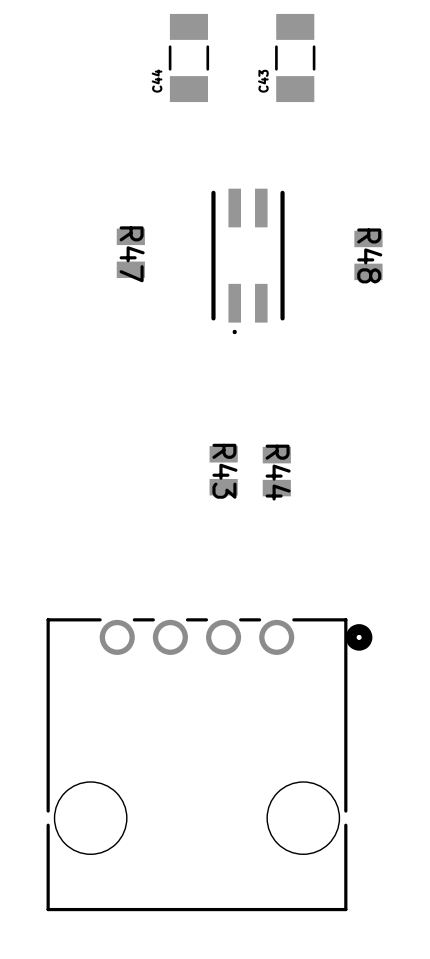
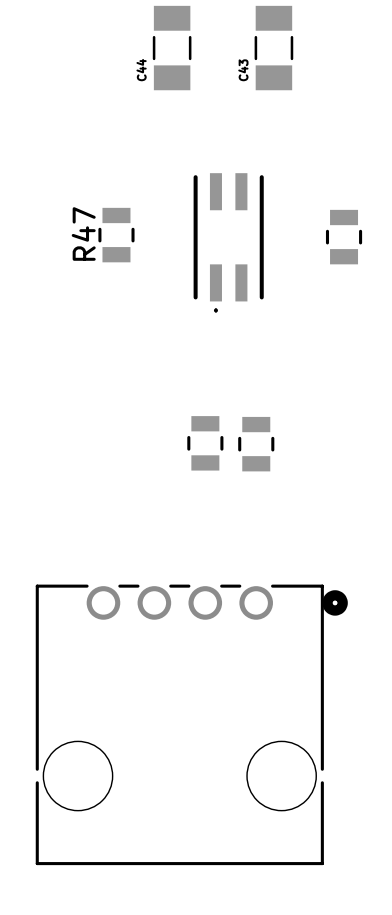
R47 footprint: [116, 228, 145, 279] -> [98, 207, 135, 263]
R48: (368, 255) -> none
part: none -> (344, 237)
R43: (223, 470) -> none
part: none -> (205, 443)
R44: (276, 471) -> none
part: none -> (256, 444)

